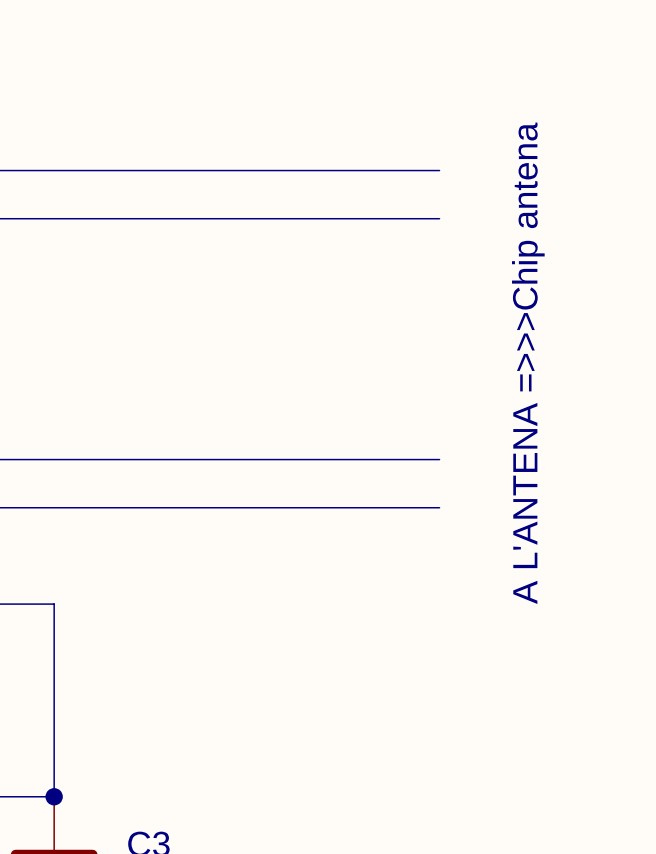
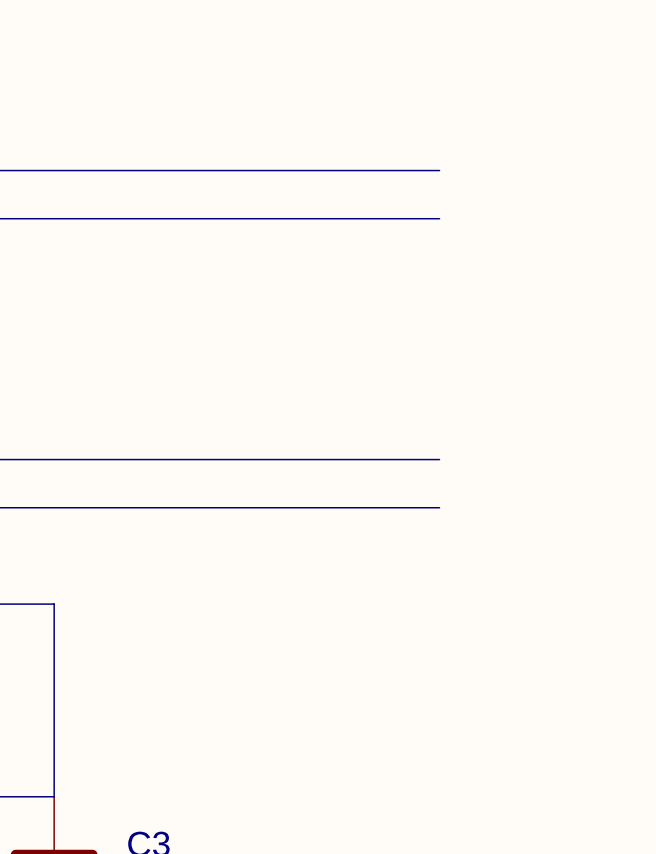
text: A L'ANTENA =>>>Chip antena (528, 363) -> none
junction: (54, 796) -> none

